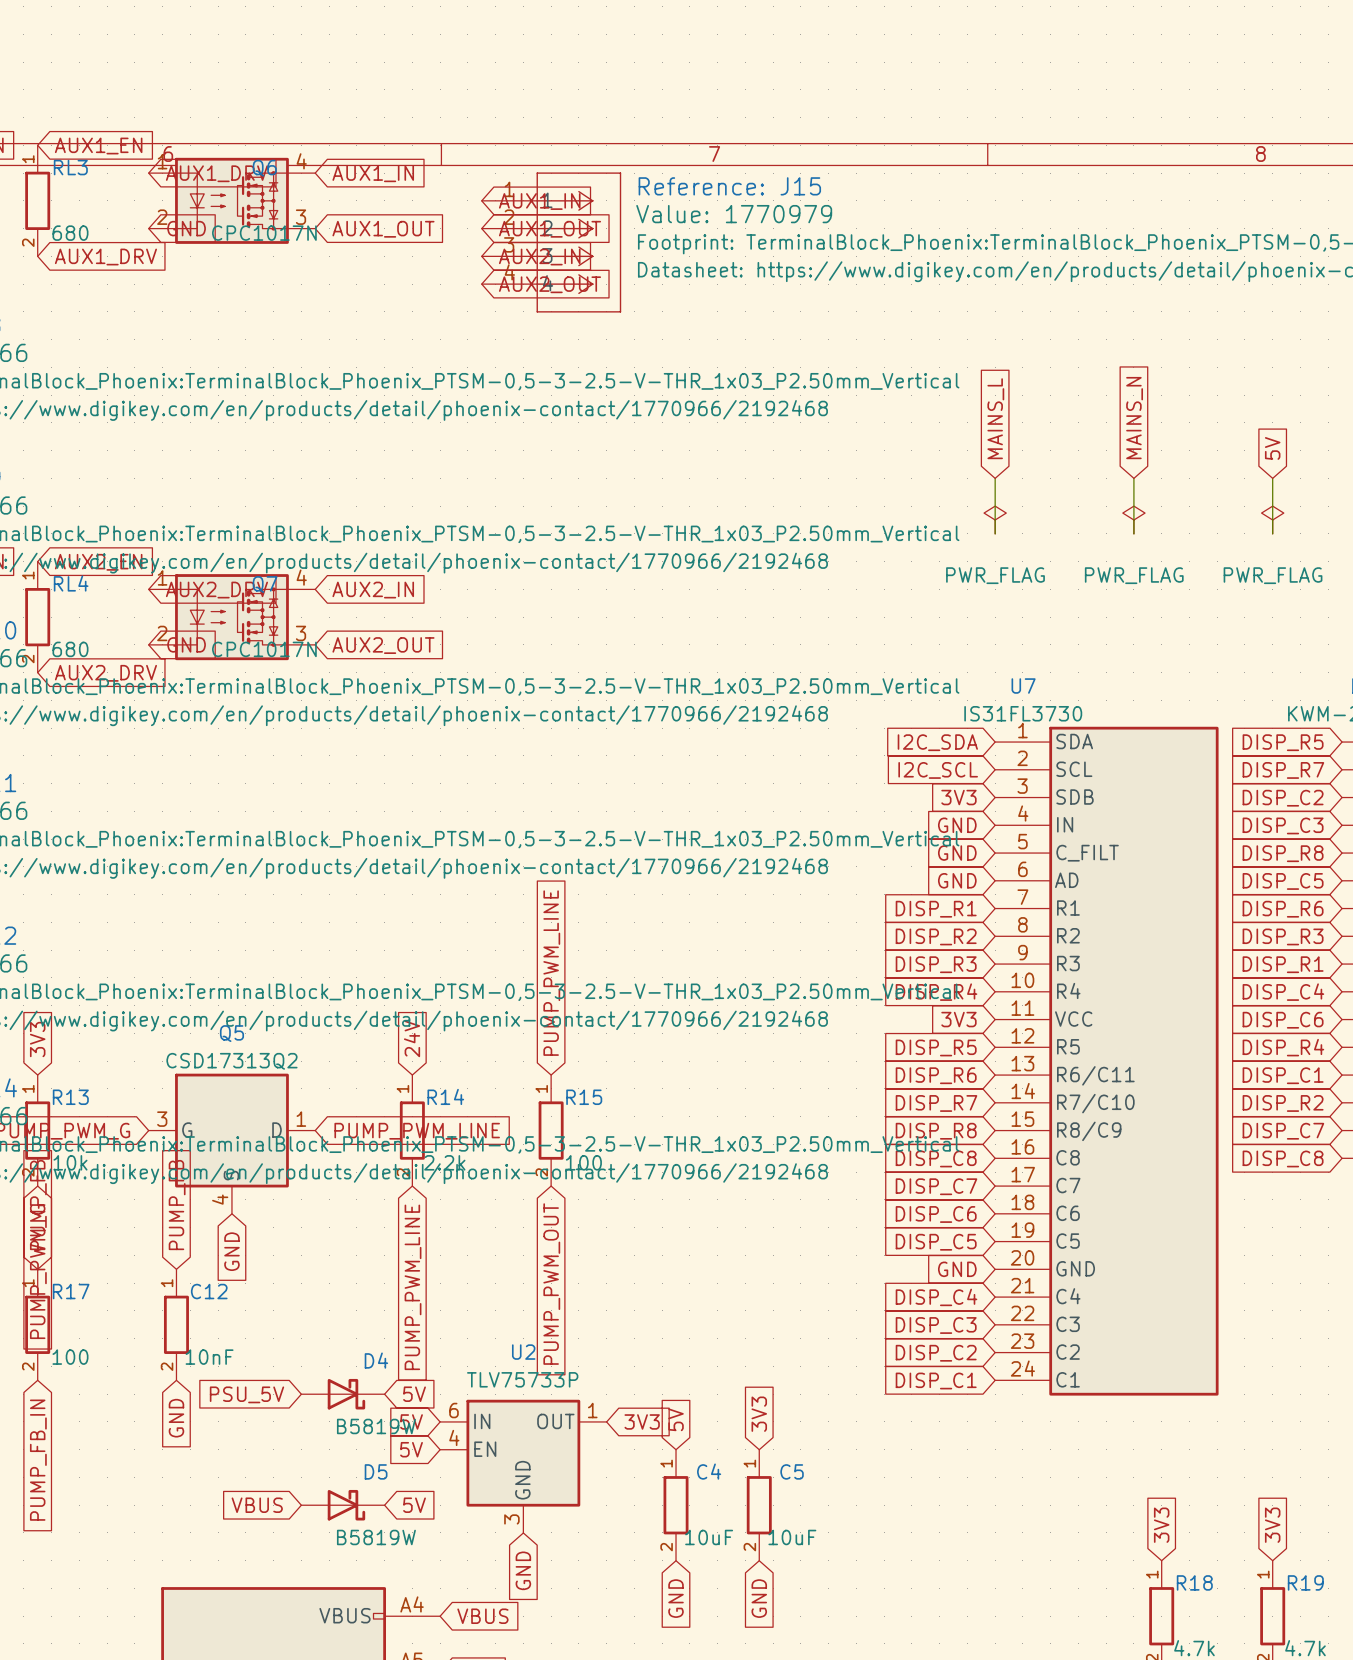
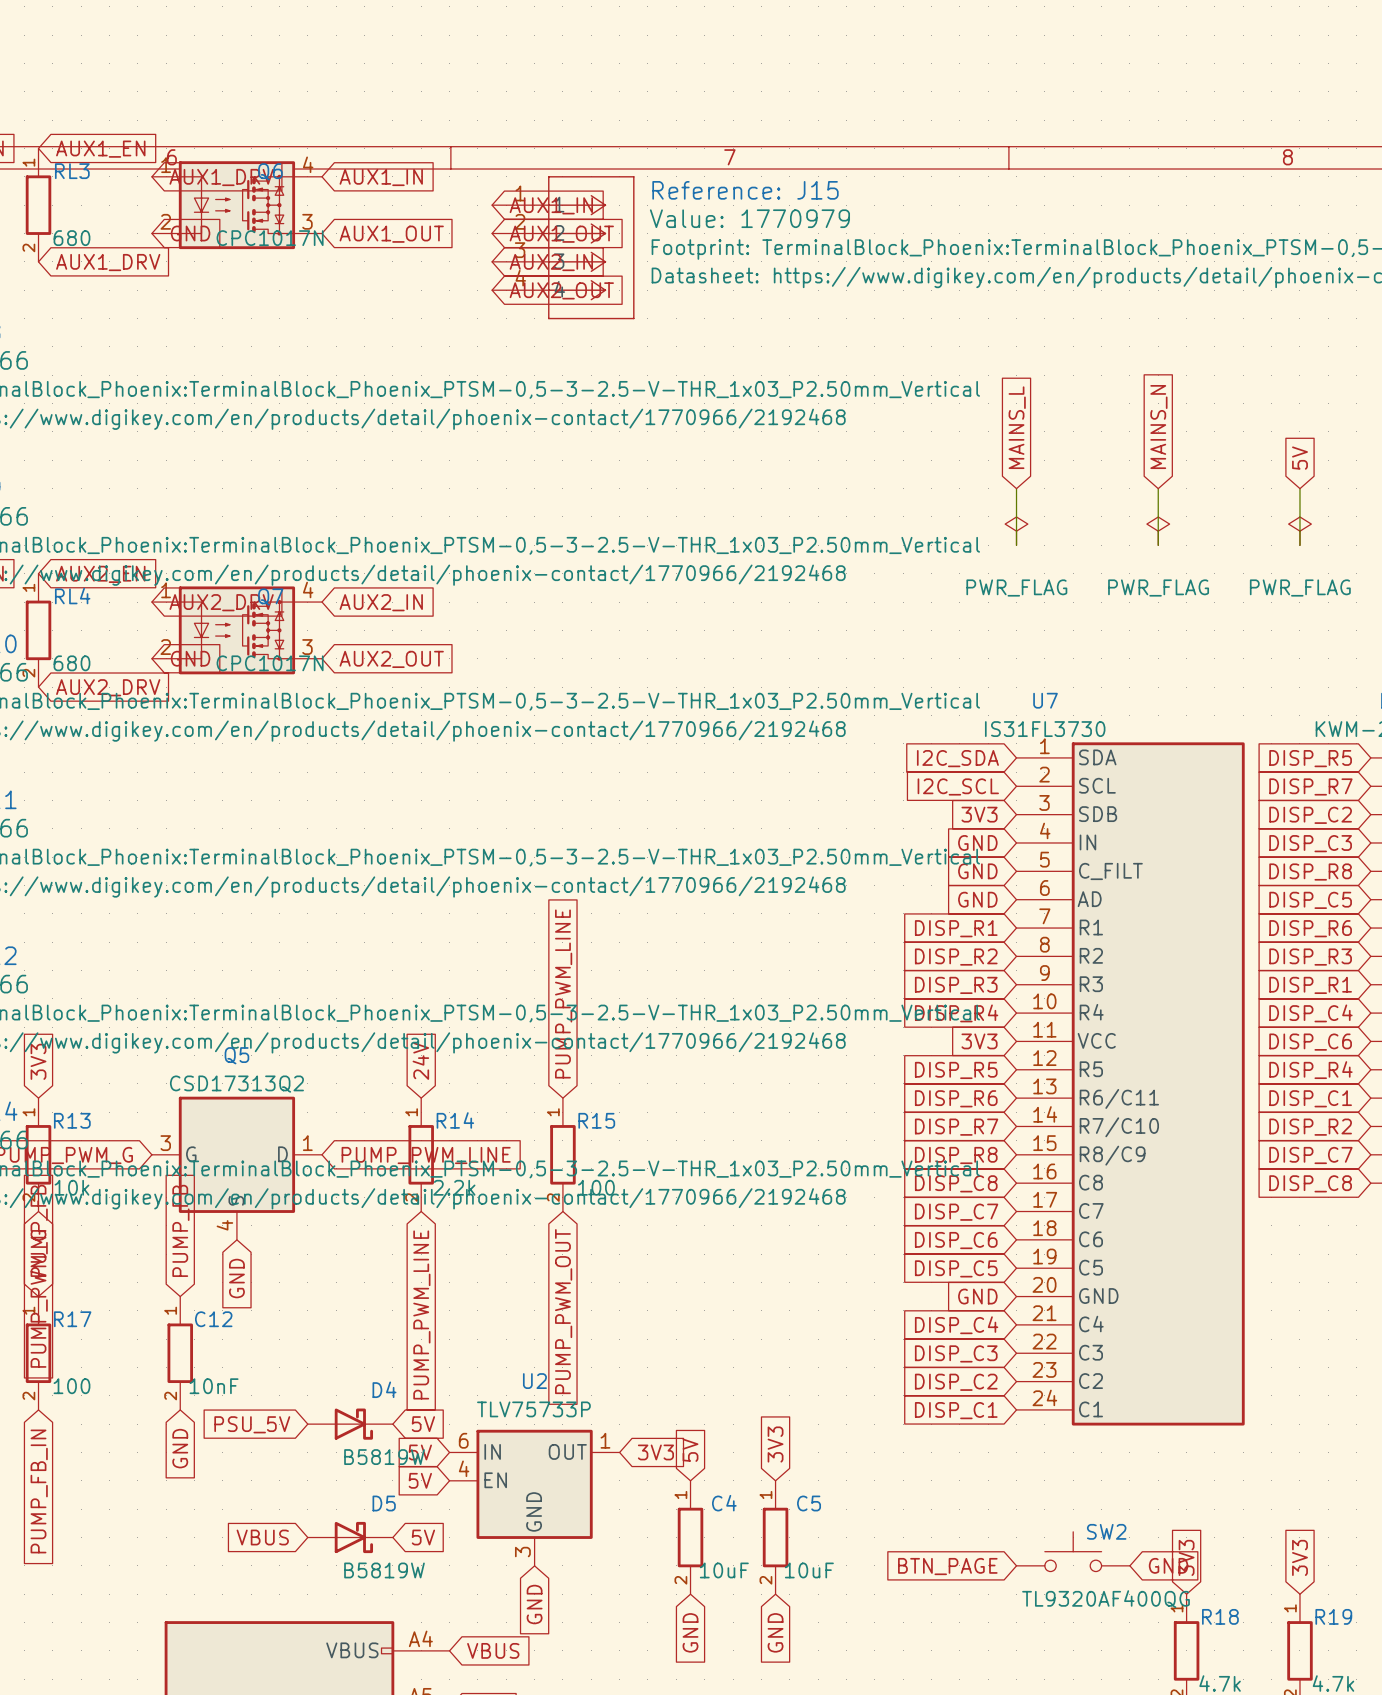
SW2: none -> TL9320AF400QG (1073, 1551)
global label: none -> GND (1168, 1565)
global label: none -> BTN_PAGE (947, 1566)

